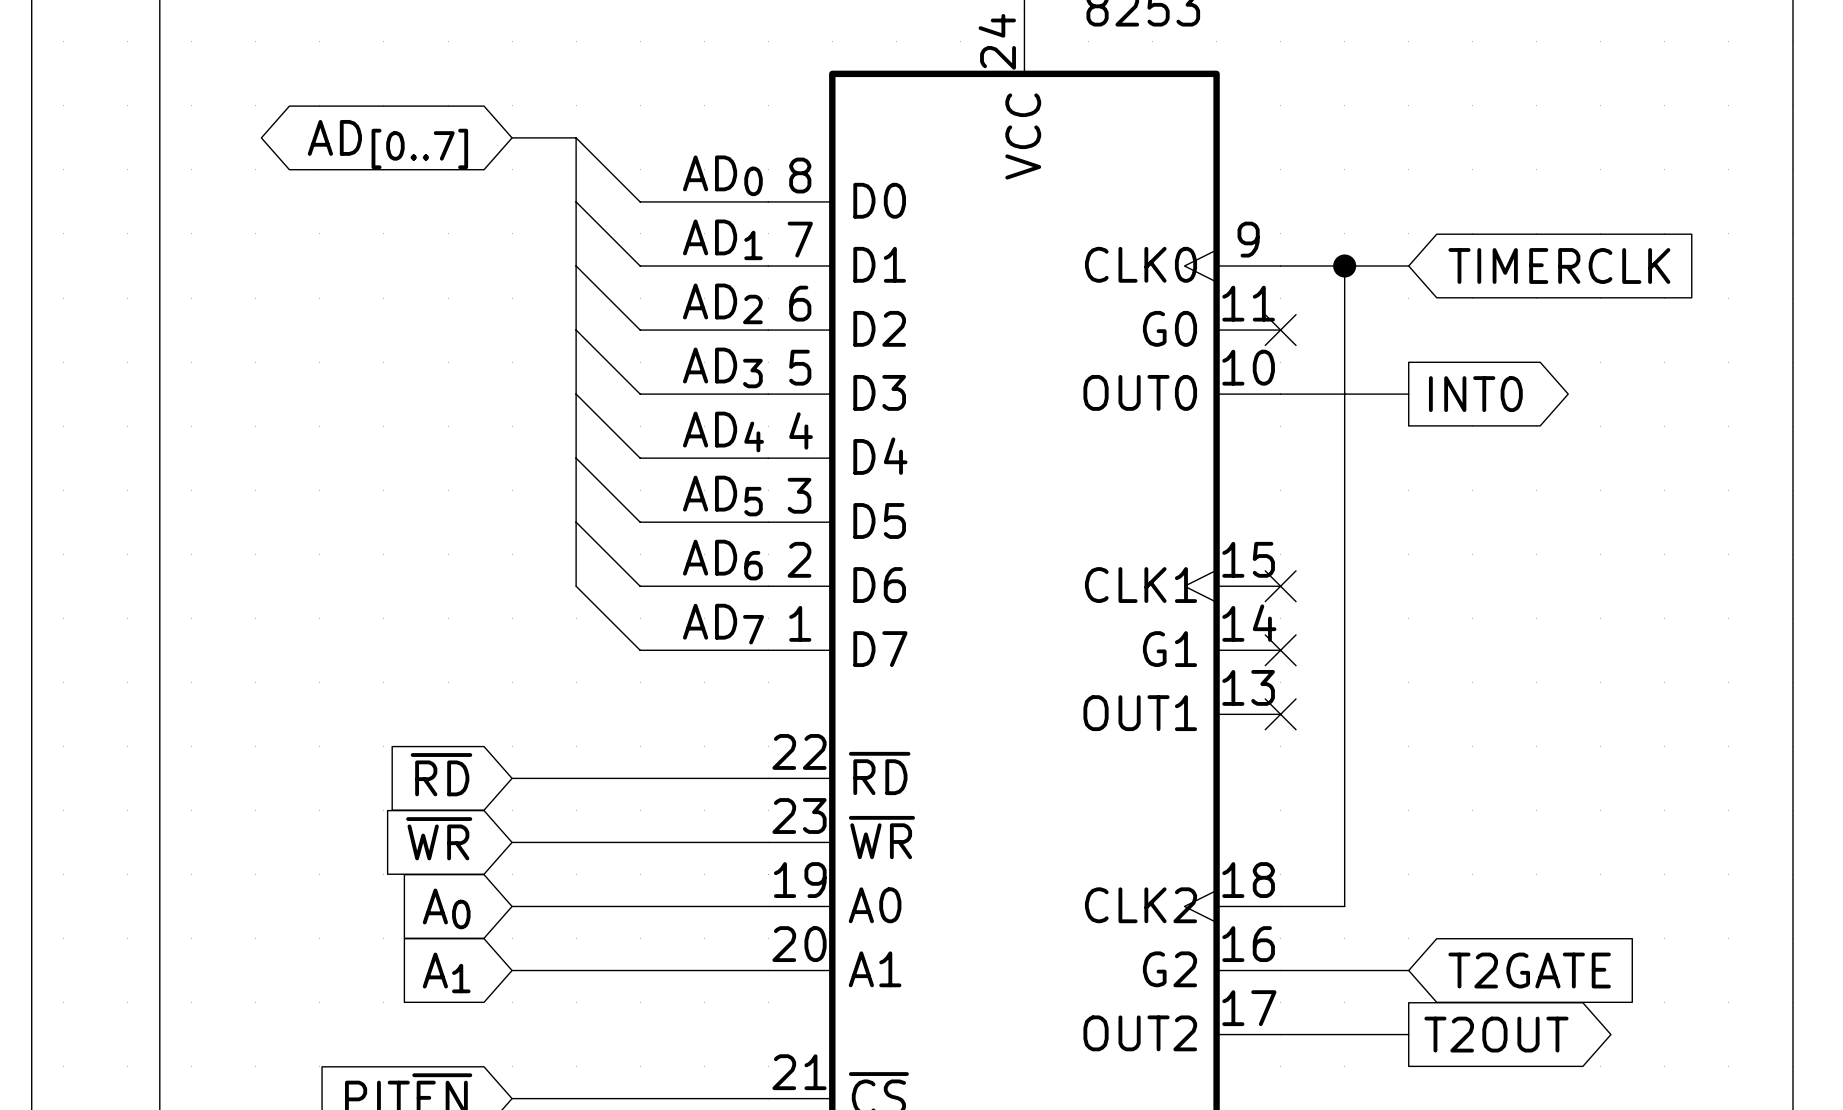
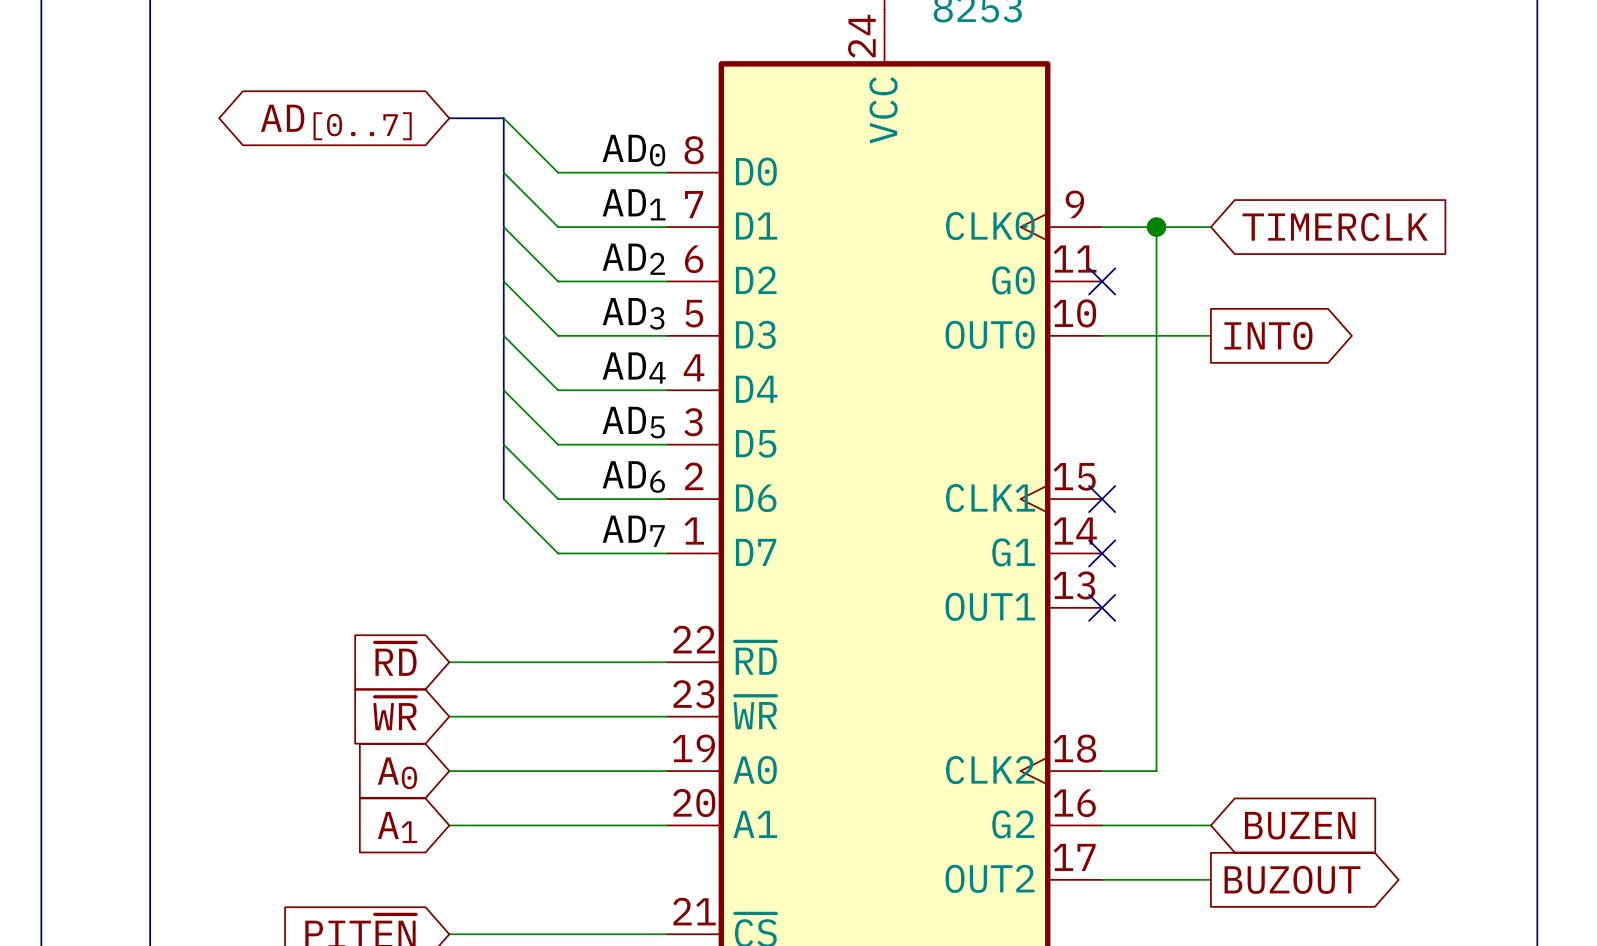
global label: T2GATE (1529, 970) -> BUZEN (1300, 825)
global label: T2OUT (1496, 1034) -> BUZOUT (1292, 879)

